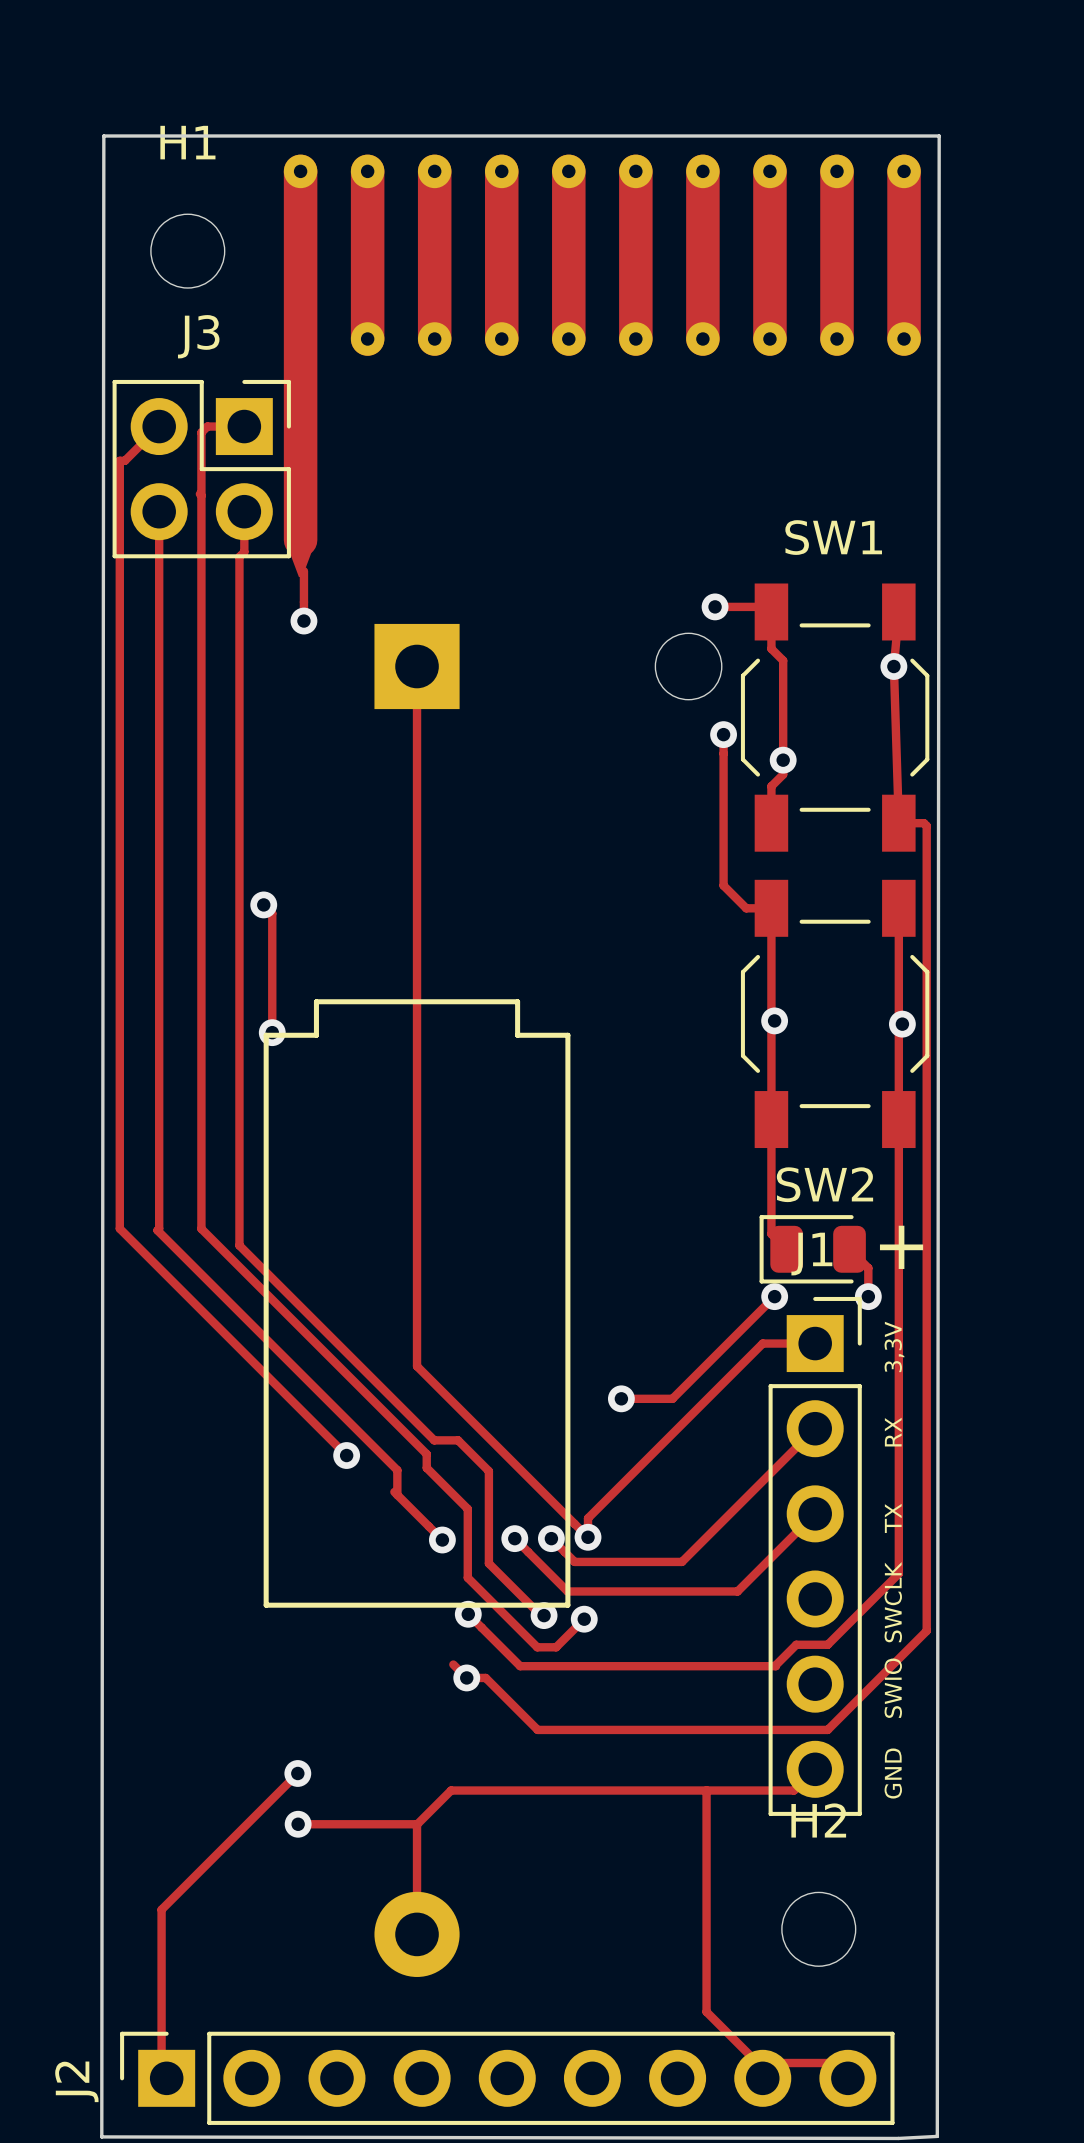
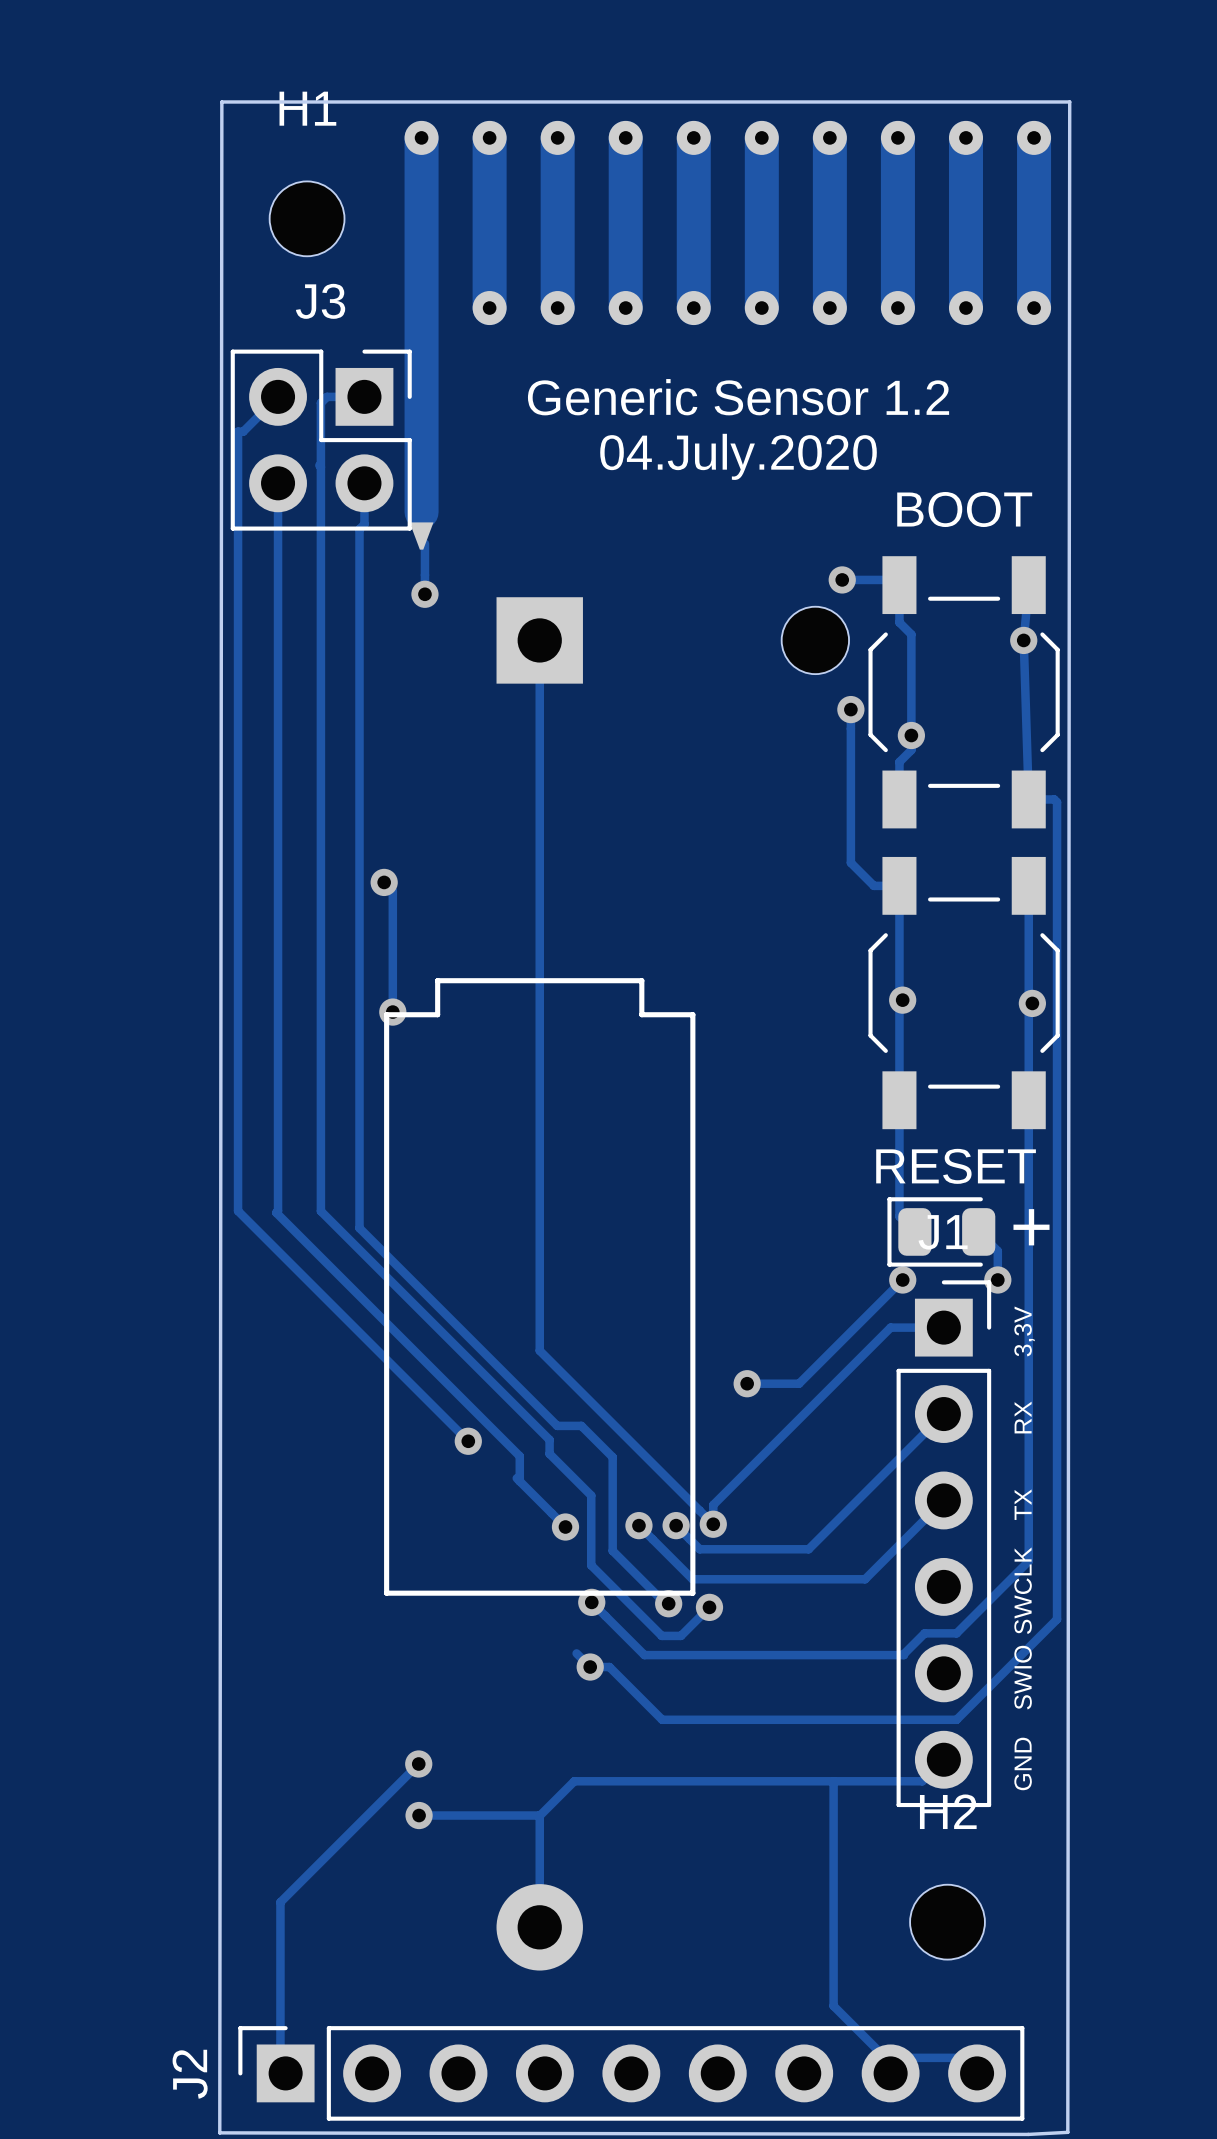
text: none -> Generic Sensor 1.2 (738, 397)
text: none -> 04.July.2020 (738, 456)
SW1 name: SW1 (833, 537) -> BOOT (964, 509)
SW2 name: SW2 (824, 1184) -> RESET (956, 1166)

